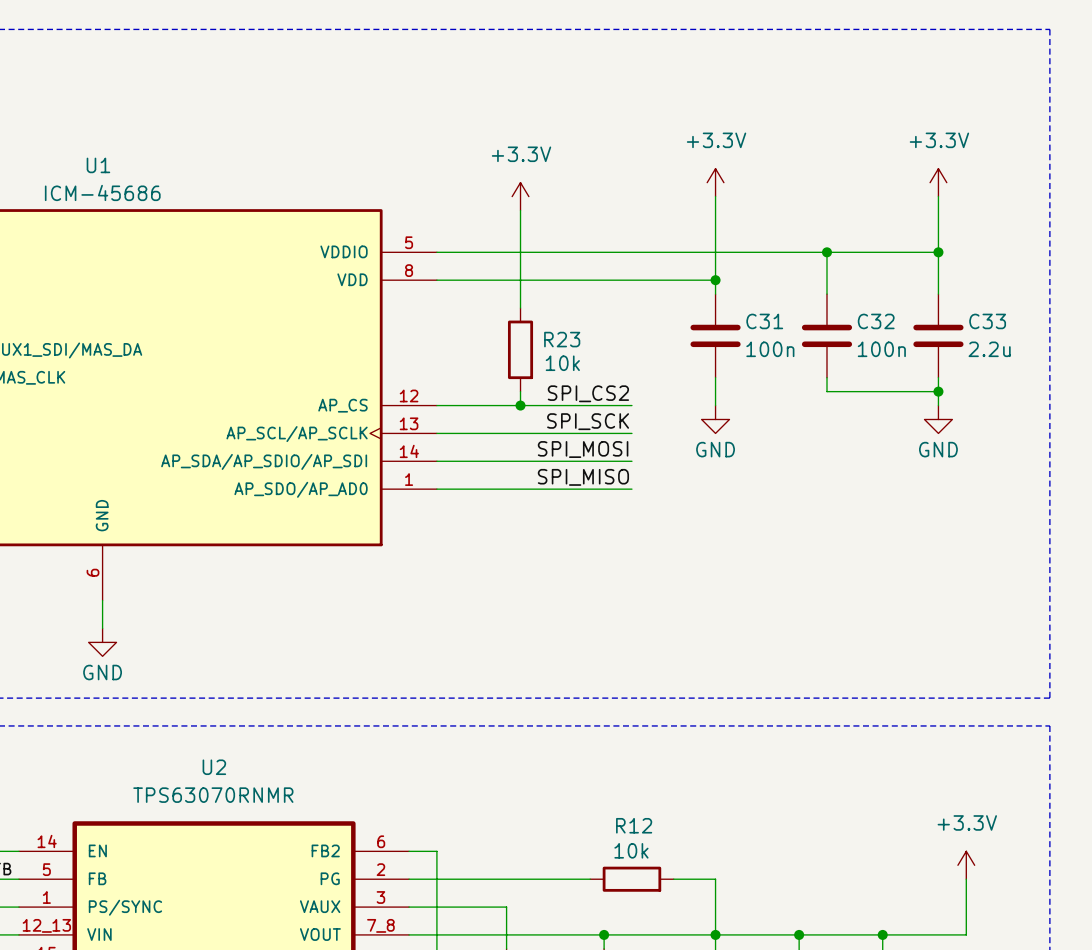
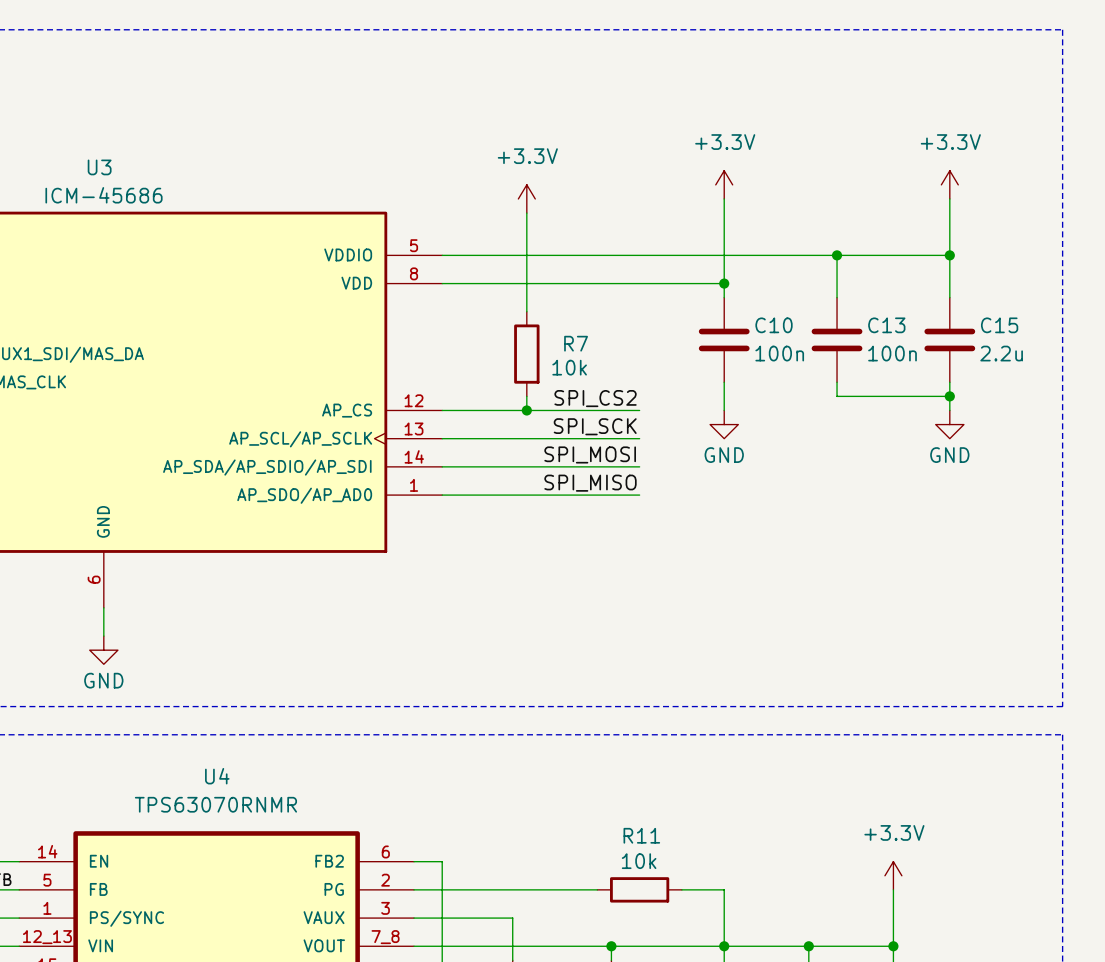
U1 name: U1 (98, 165) -> U3 (99, 167)
C31 name: C31 (764, 321) -> C10 (774, 325)
C32 name: C32 (876, 321) -> C13 (886, 325)
C33 name: C33 (987, 321) -> C15 (999, 325)
R23 name: R23 (562, 339) -> R7 (576, 343)
U2 name: U2 (214, 767) -> U4 (217, 776)
R12 name: R12 (634, 825) -> R11 (641, 835)
power symbol position: +3.3V (966, 865) -> +3.3V (893, 875)
wire: (966, 879) (966, 934) (882, 934) -> (893, 889) (893, 946)

